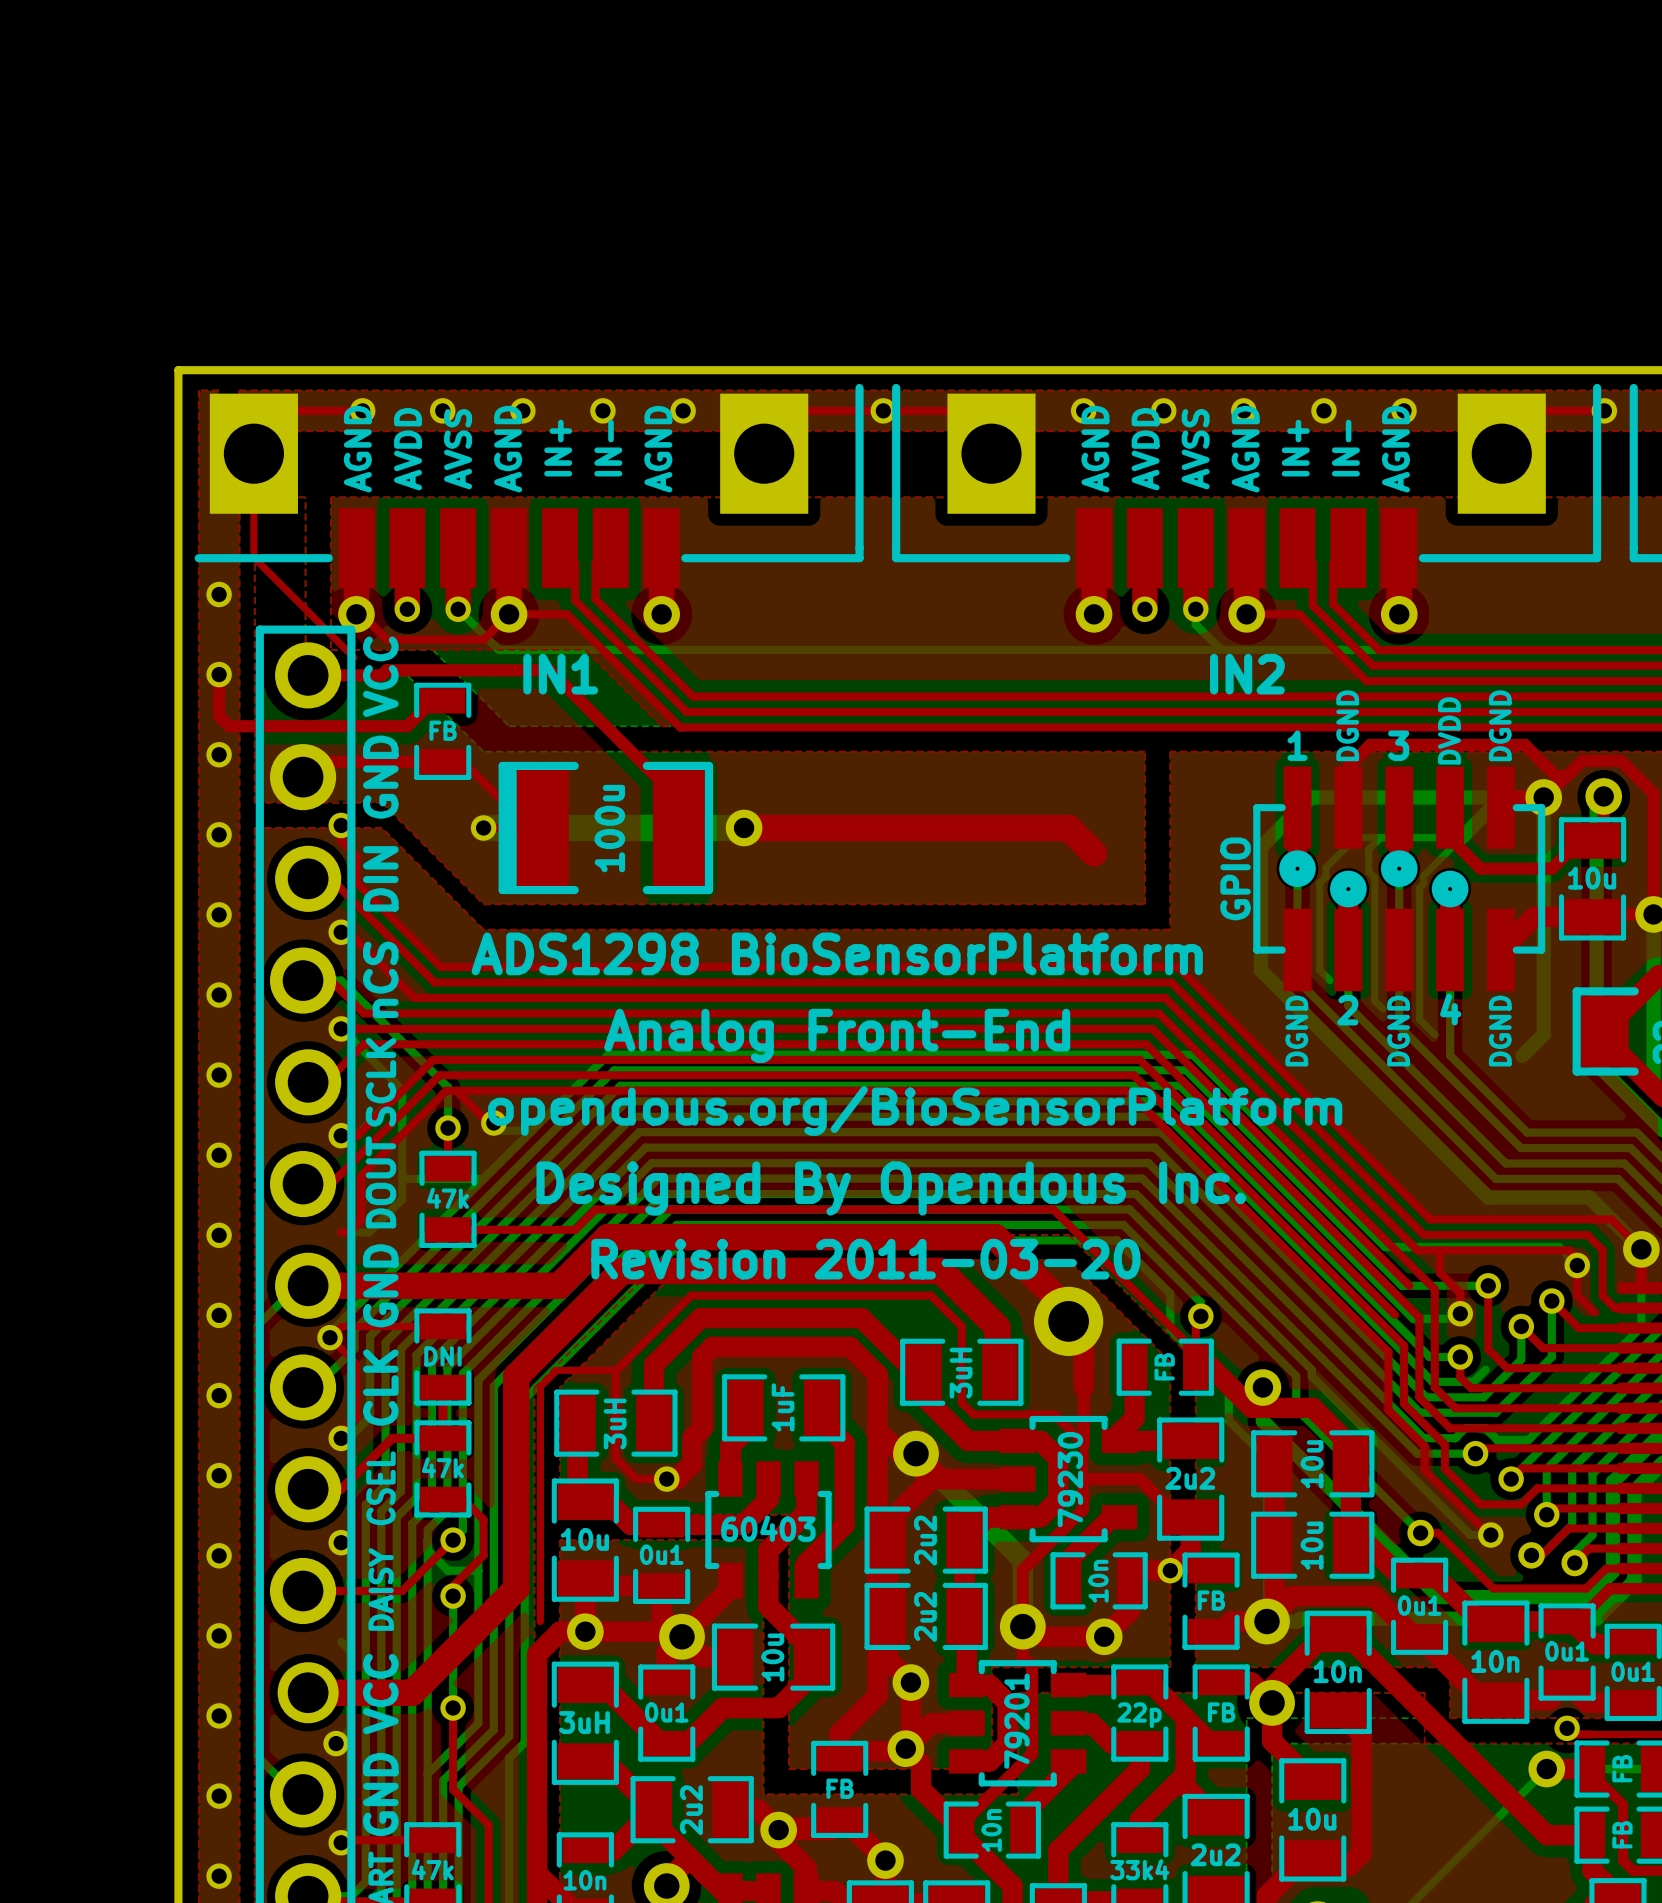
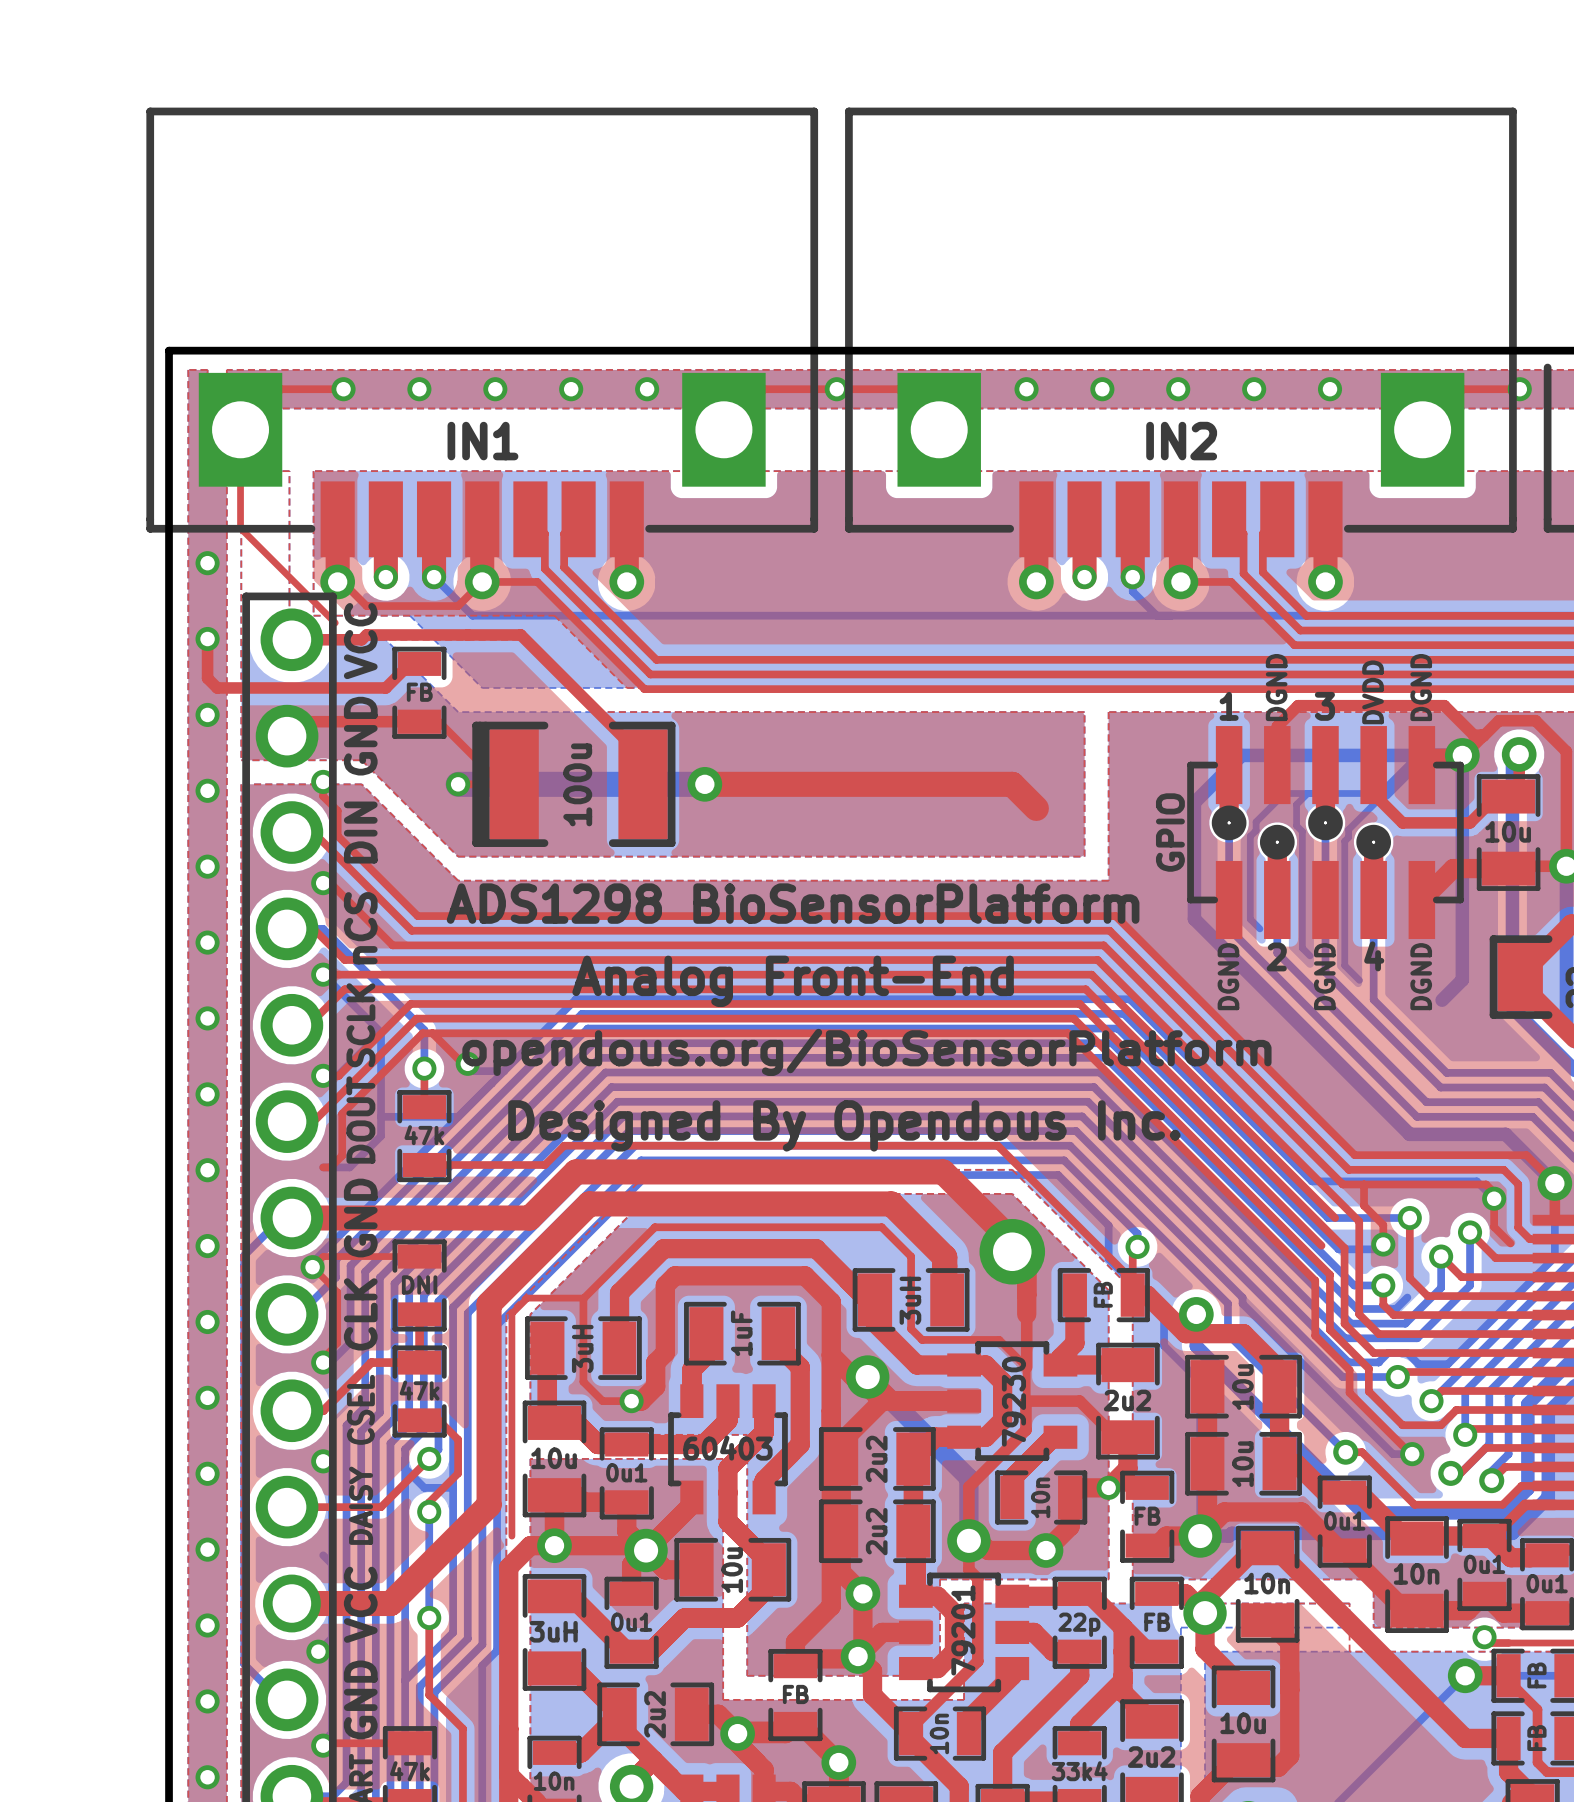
IN1 footprint: [194, 383, 864, 589] -> [146, 107, 819, 558]
IN2 footprint: [892, 383, 1602, 589] -> [845, 107, 1517, 558]
text: Revision 2011-03-20 (865, 1259) -> none

